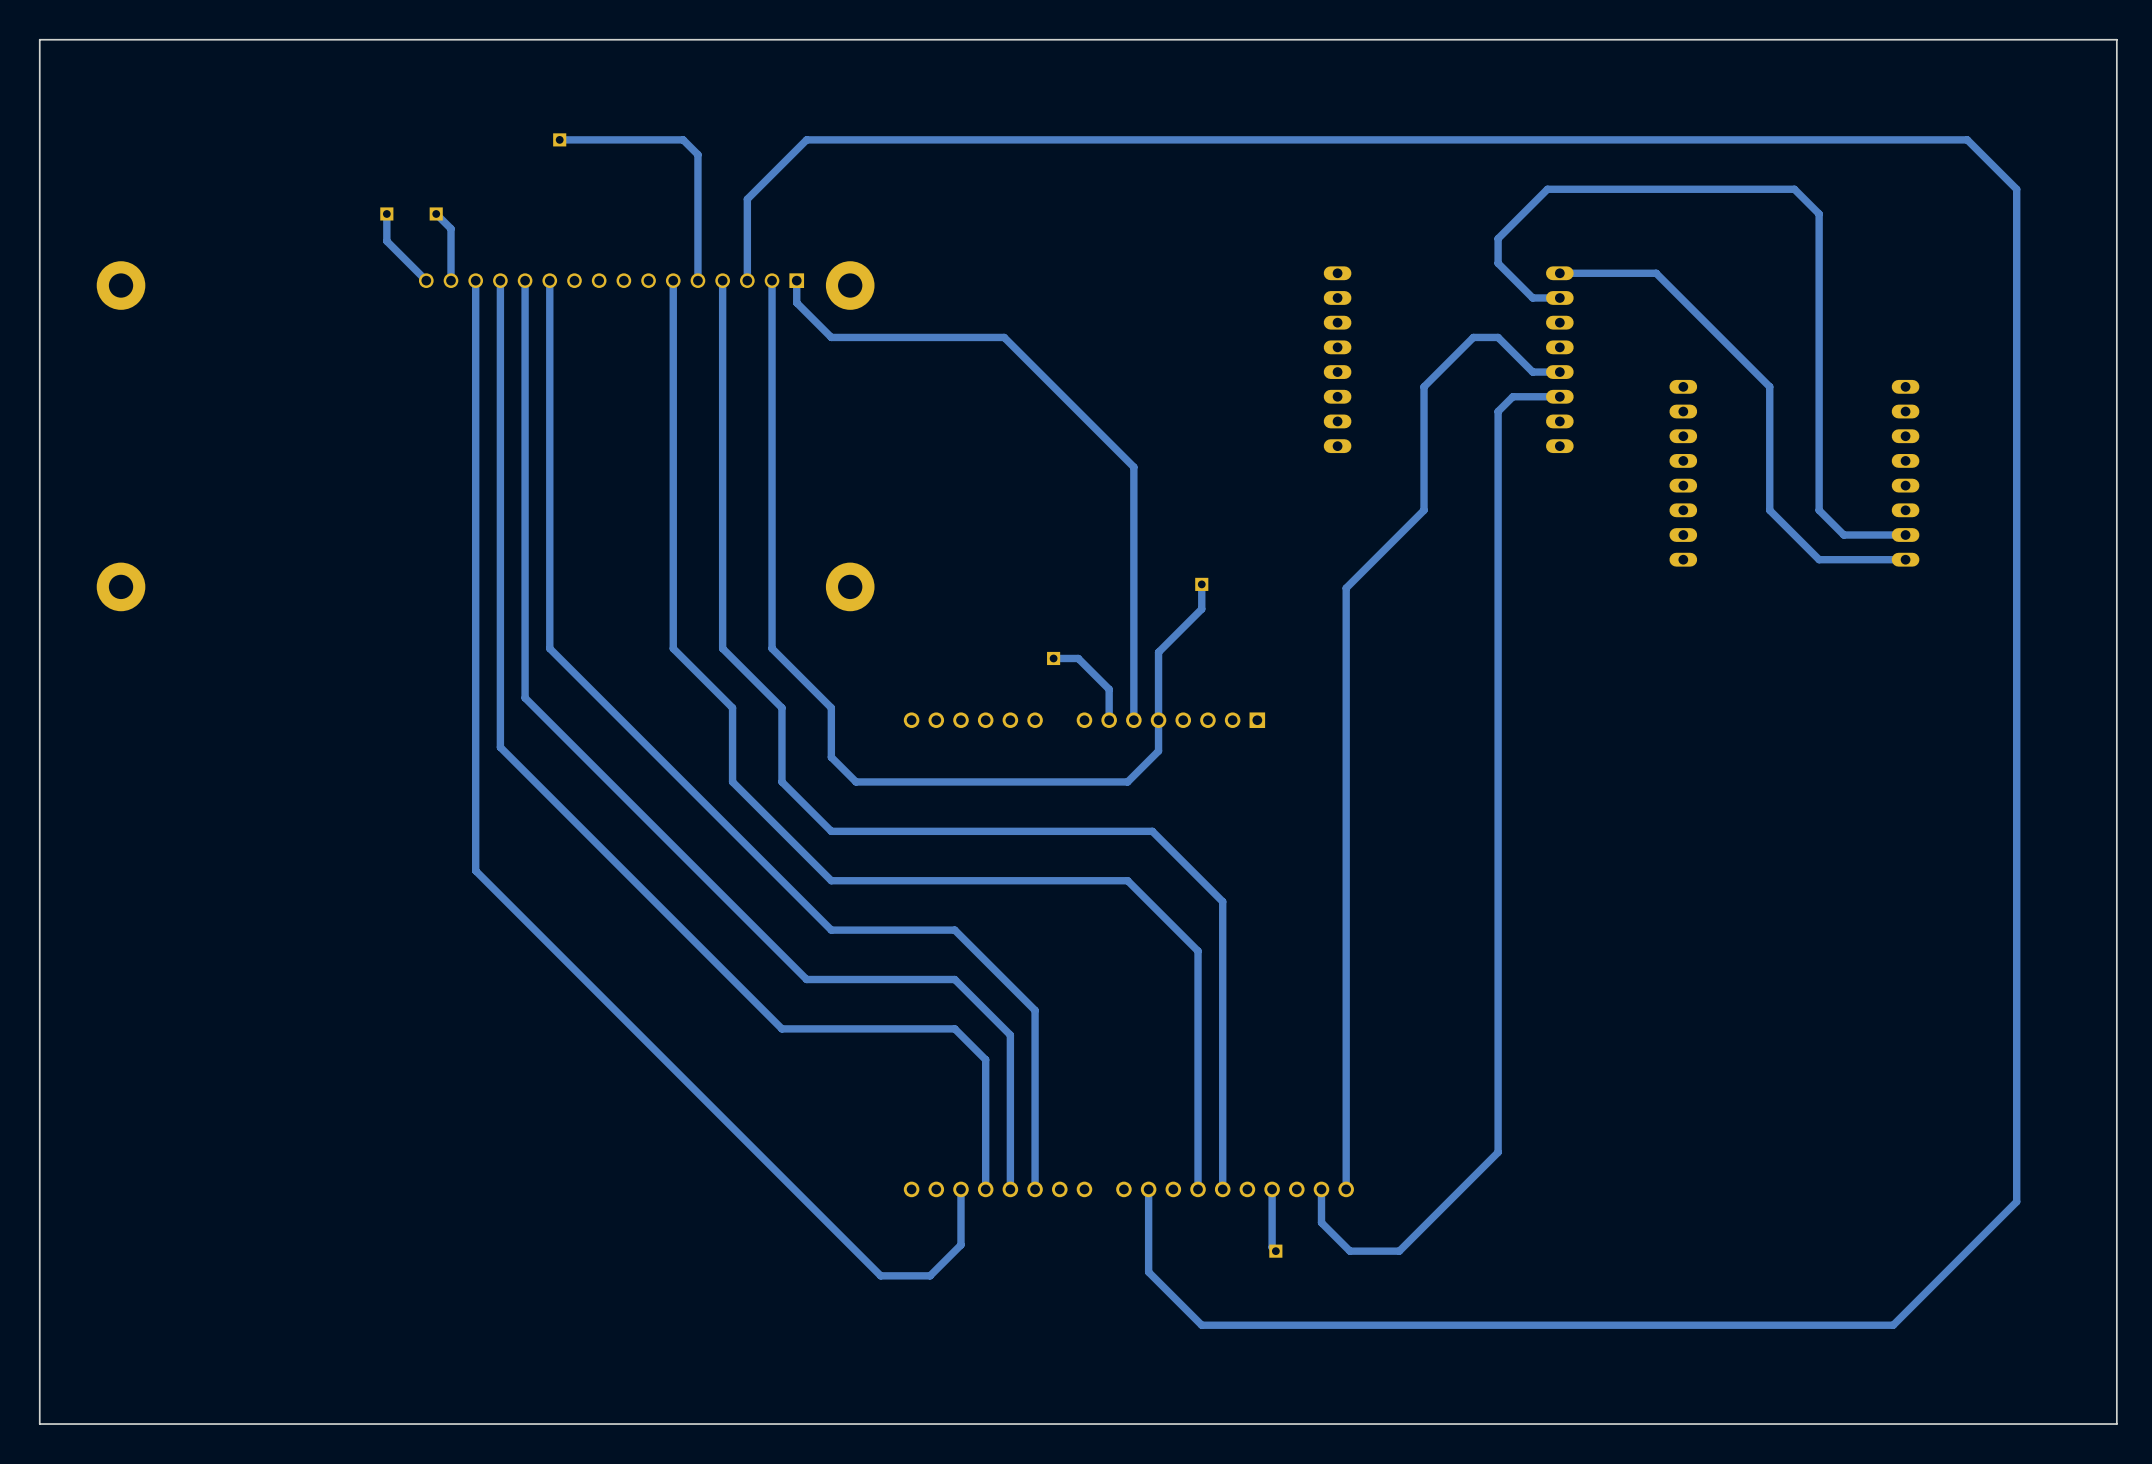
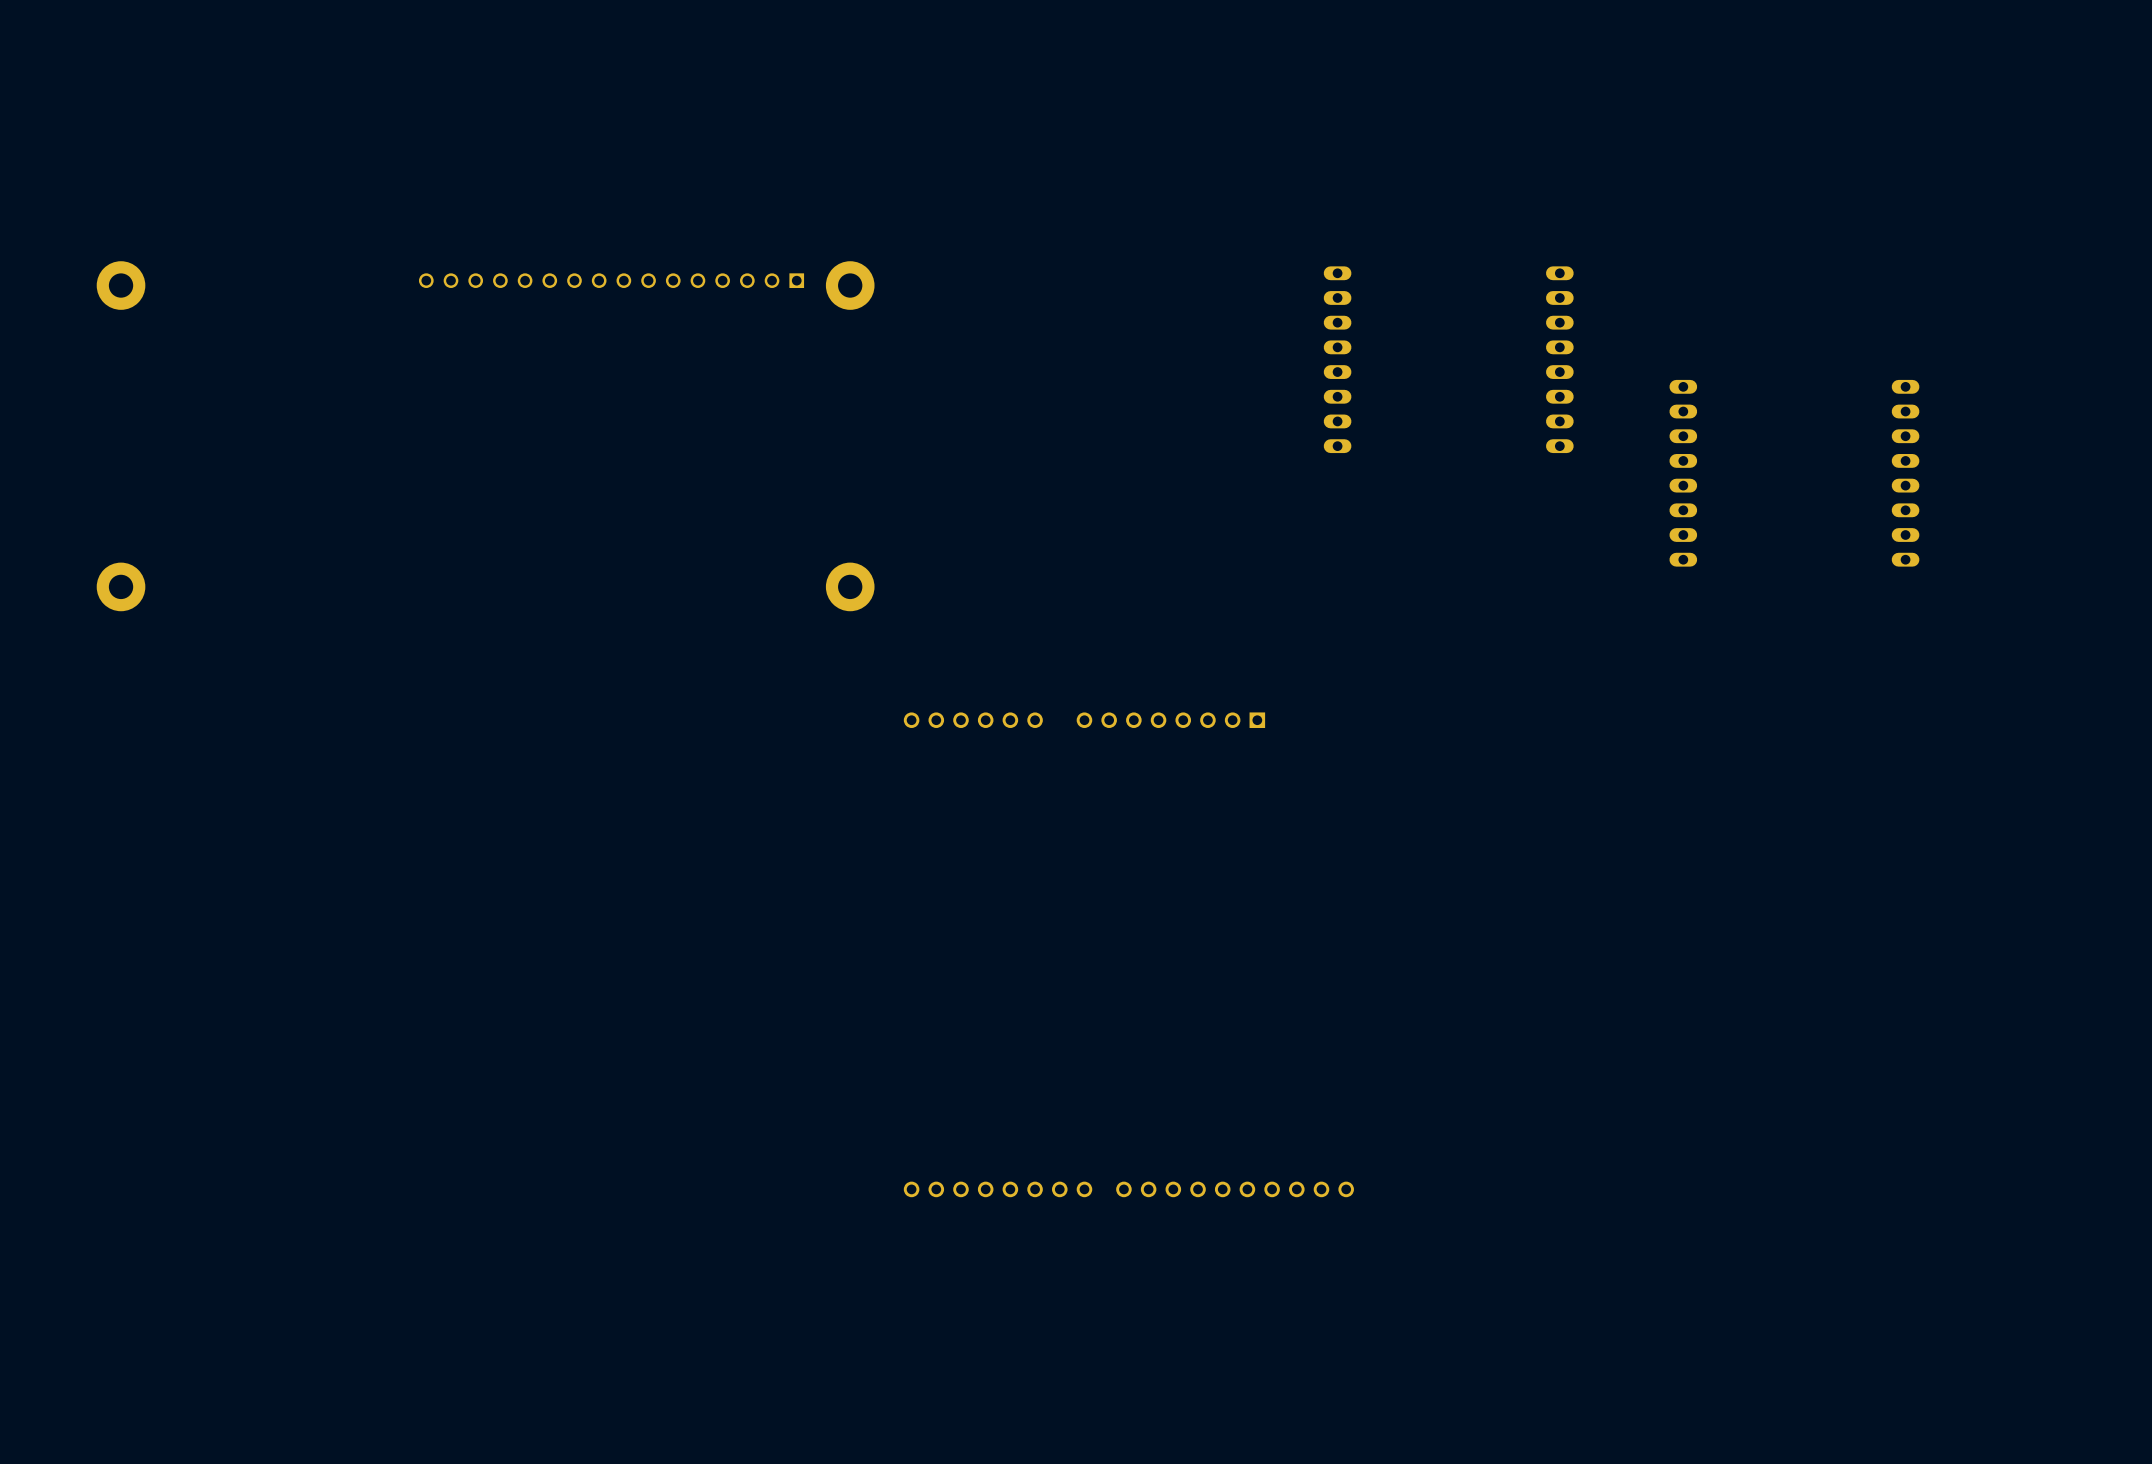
board edge: (2116, 39) (39, 39) (39, 1424) (2116, 1424) (2116, 39) -> none
bottom track: (559, 139) (683, 139) (697, 154) (697, 280) -> none
part: (559, 139) -> none
bottom track: (386, 213) (386, 241) (426, 280) -> none
part: (386, 213) -> none
bottom track: (436, 213) (451, 228) (451, 280) -> none
part: (436, 213) -> none
bottom track: (1559, 273) (1656, 273) (1769, 386) (1769, 510) (1819, 559) (1905, 559) -> none
bottom track: (475, 280) (475, 870) (880, 1275) (930, 1275) (960, 1244) (960, 1189) -> none
bottom track: (500, 280) (500, 747) (781, 1028) (954, 1028) (985, 1059) (985, 1189) -> none
bottom track: (525, 280) (525, 697) (806, 979) (954, 979) (1010, 1035) (1010, 1189) -> none
bottom track: (549, 280) (549, 648) (831, 930) (954, 930) (1035, 1010) (1035, 1189) -> none
bottom track: (673, 280) (673, 648) (732, 707) (732, 781) (831, 880) (1127, 880) (1198, 951) (1198, 1189) -> none
bottom track: (722, 280) (722, 648) (781, 707) (781, 781) (831, 831) (1152, 831) (1222, 901) (1222, 1189) -> none
bottom track: (747, 280) (747, 199) (806, 139) (1967, 139) (2016, 189) (2016, 1201) (1893, 1325) (1201, 1325) (1148, 1272) (1148, 1189) -> none
bottom track: (772, 280) (772, 648) (831, 707) (831, 757) (856, 781) (1127, 781) (1158, 751) (1158, 652) (1201, 609) (1201, 584) -> none
bottom track: (796, 280) (796, 302) (831, 337) (1004, 337) (1133, 467) (1133, 720) -> none
bottom track: (1559, 297) (1532, 297) (1498, 263) (1498, 238) (1547, 189) (1794, 189) (1819, 213) (1819, 510) (1843, 535) (1905, 535) -> none
bottom track: (1559, 372) (1532, 372) (1498, 337) (1473, 337) (1424, 386) (1424, 510) (1346, 588) (1346, 1189) -> none
bottom track: (1559, 396) (1512, 396) (1498, 411) (1498, 1152) (1399, 1251) (1349, 1251) (1321, 1222) (1321, 1189) -> none
part: (1201, 584) -> none
bottom track: (1053, 658) (1078, 658) (1109, 689) (1109, 720) -> none
part: (1053, 658) -> none
bottom track: (1272, 1189) (1272, 1247) (1275, 1251) -> none
part: (1275, 1251) -> none

